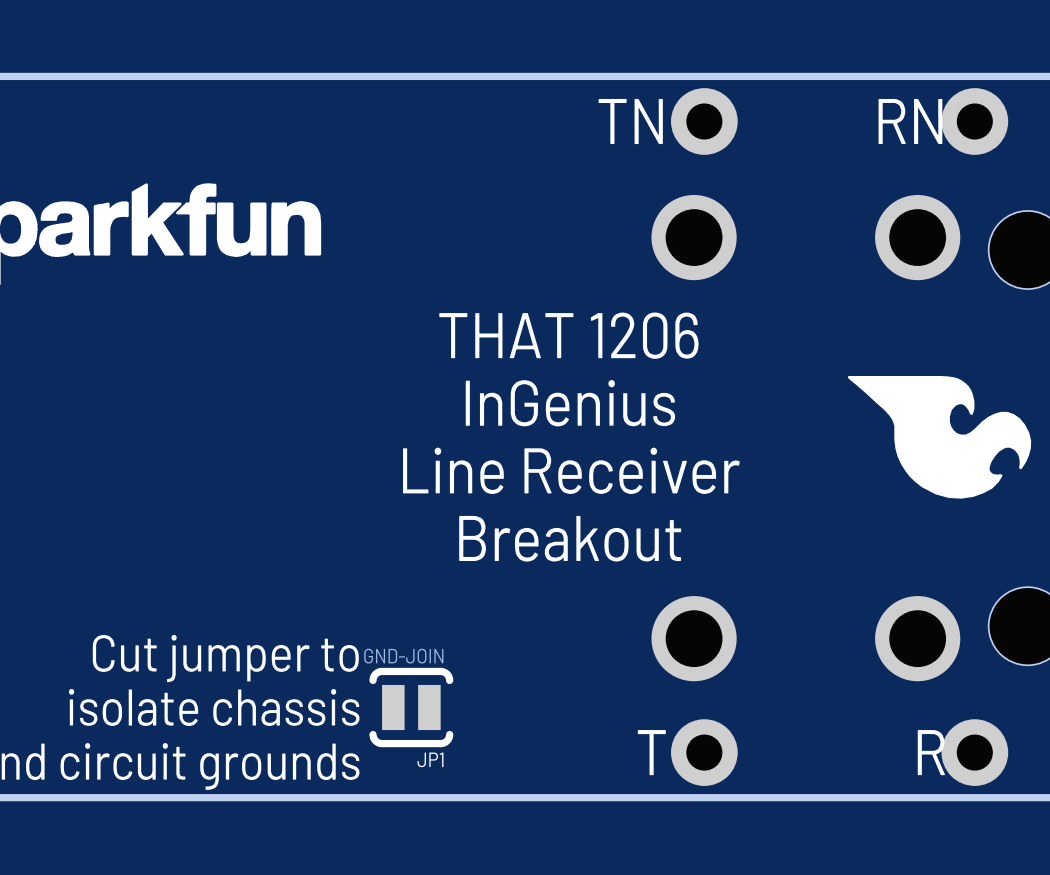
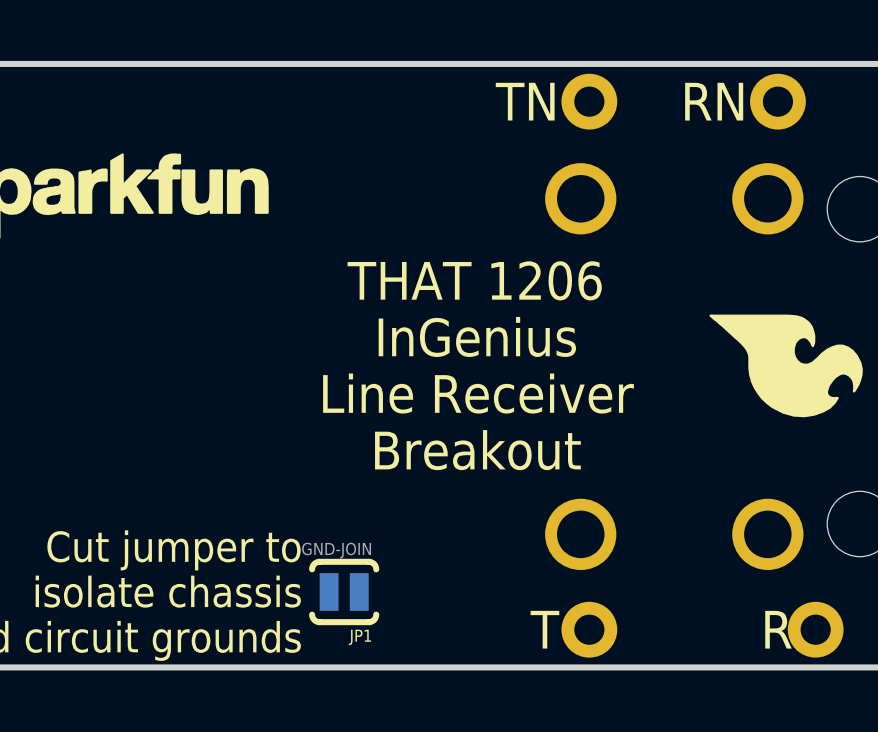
text position: RN (910, 121) -> RN (714, 101)
part position: (974, 121) -> (777, 101)

